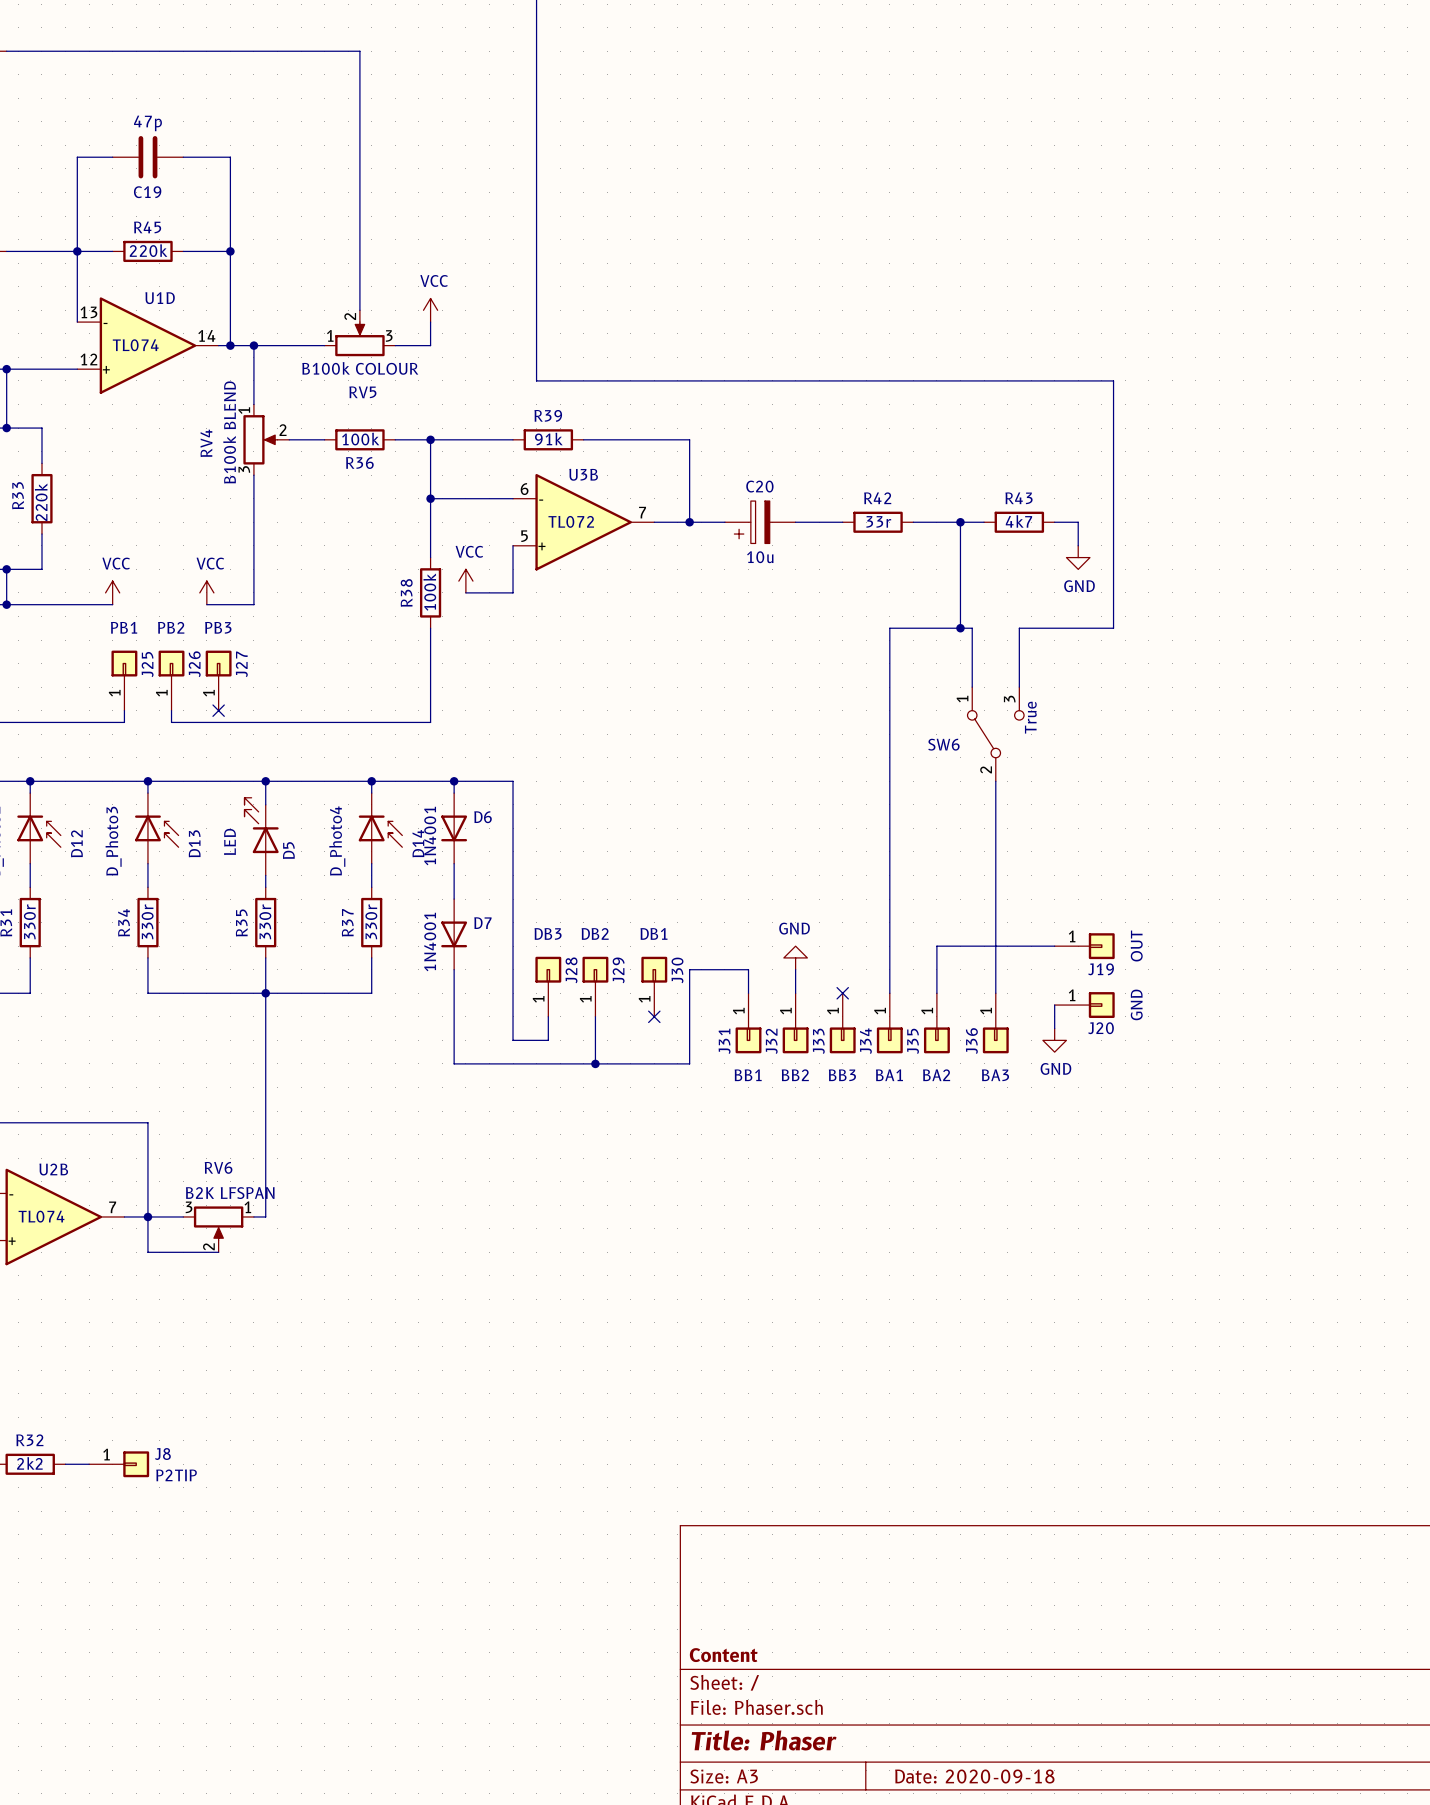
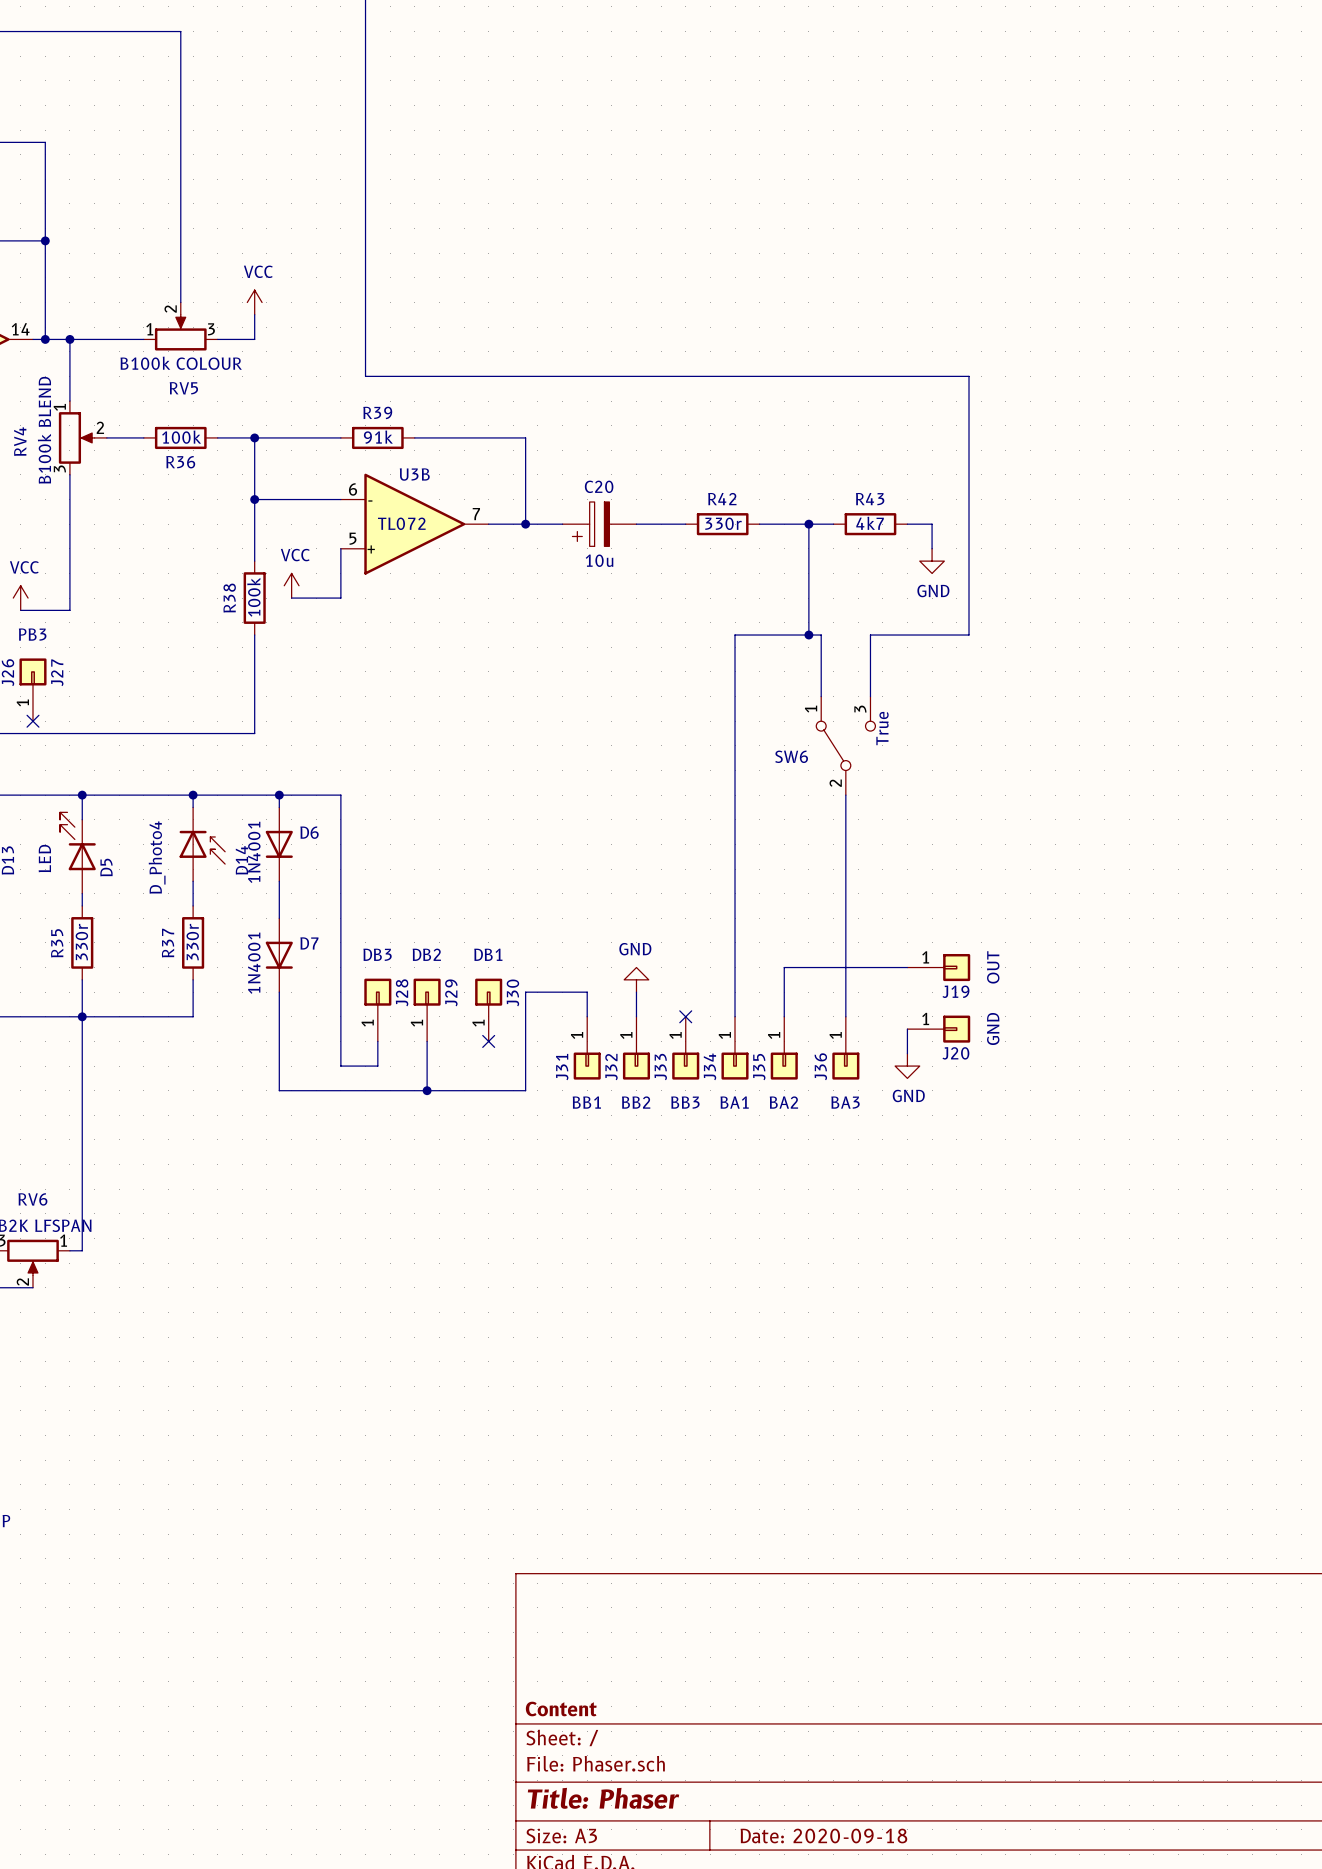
R42 value: 33r (878, 521) -> 330r (723, 523)

